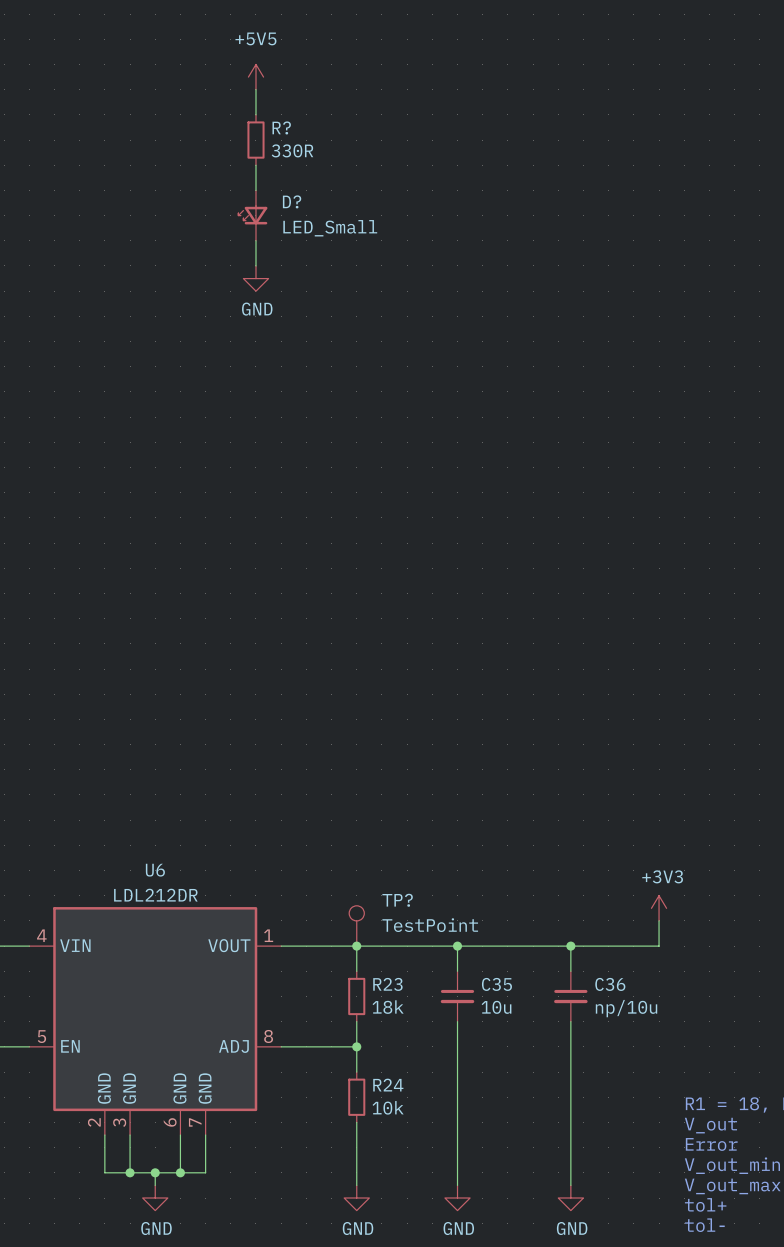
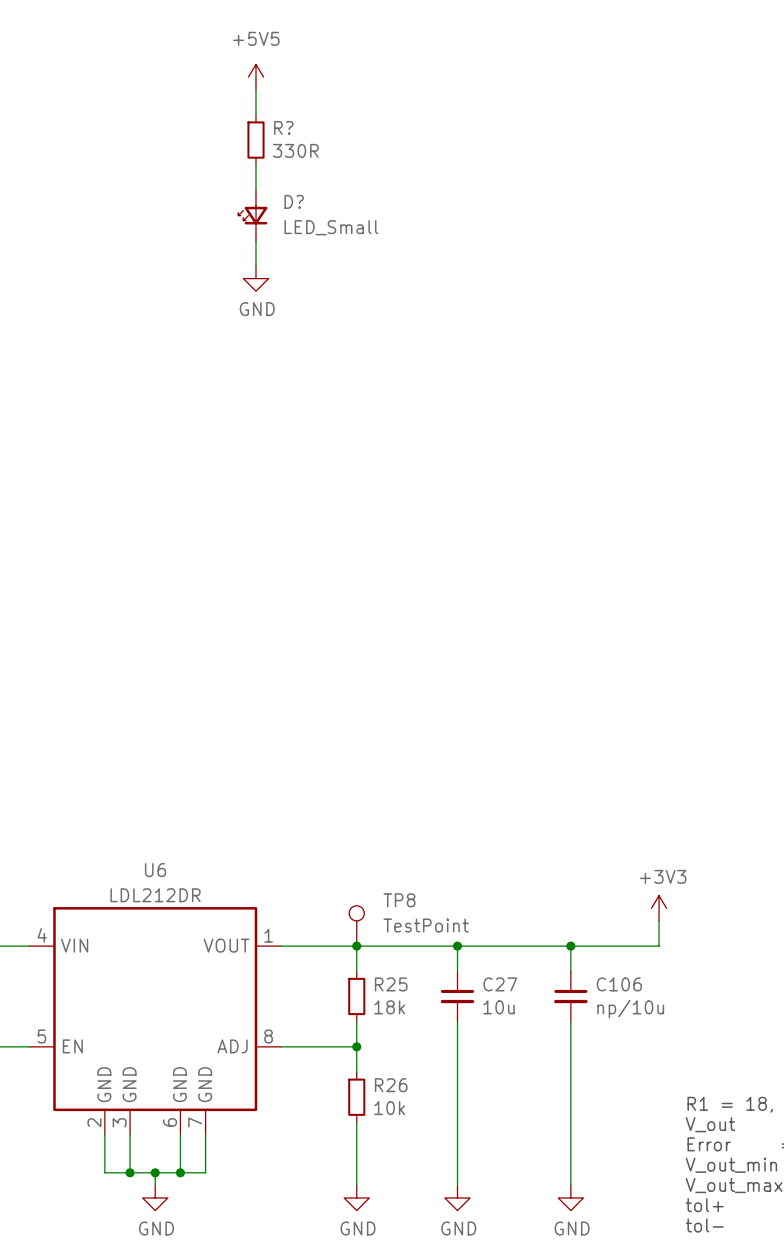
TP? name: TP? (397, 900) -> TP8 (399, 900)
R23 name: R23 (387, 984) -> R25 (391, 984)
C35 name: C35 (496, 984) -> C27 (500, 984)
C36 name: C36 (610, 984) -> C106 (619, 984)
R24 name: R24 (388, 1085) -> R26 (391, 1085)

